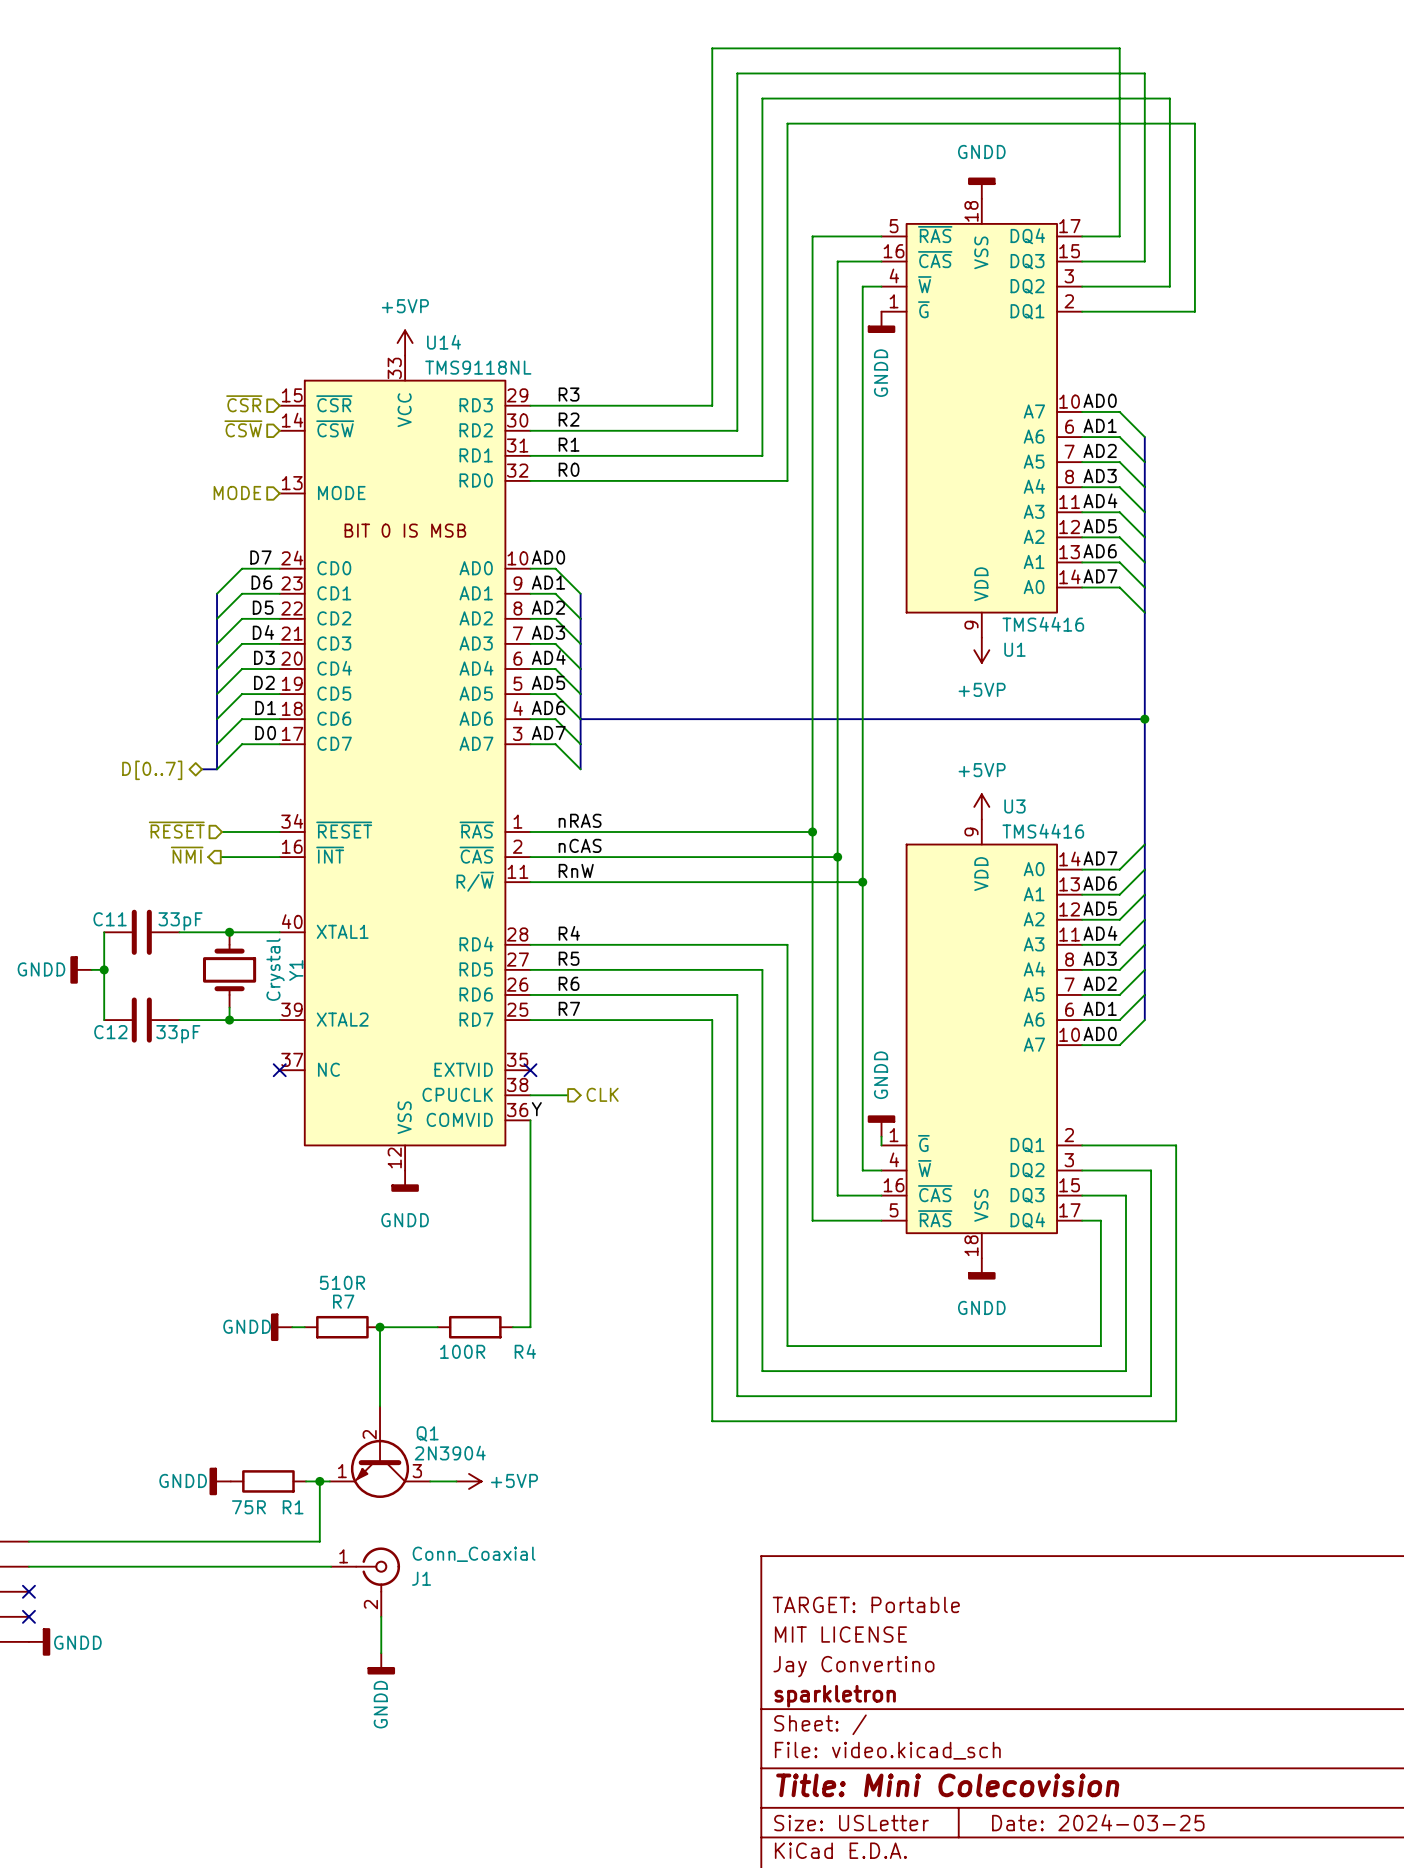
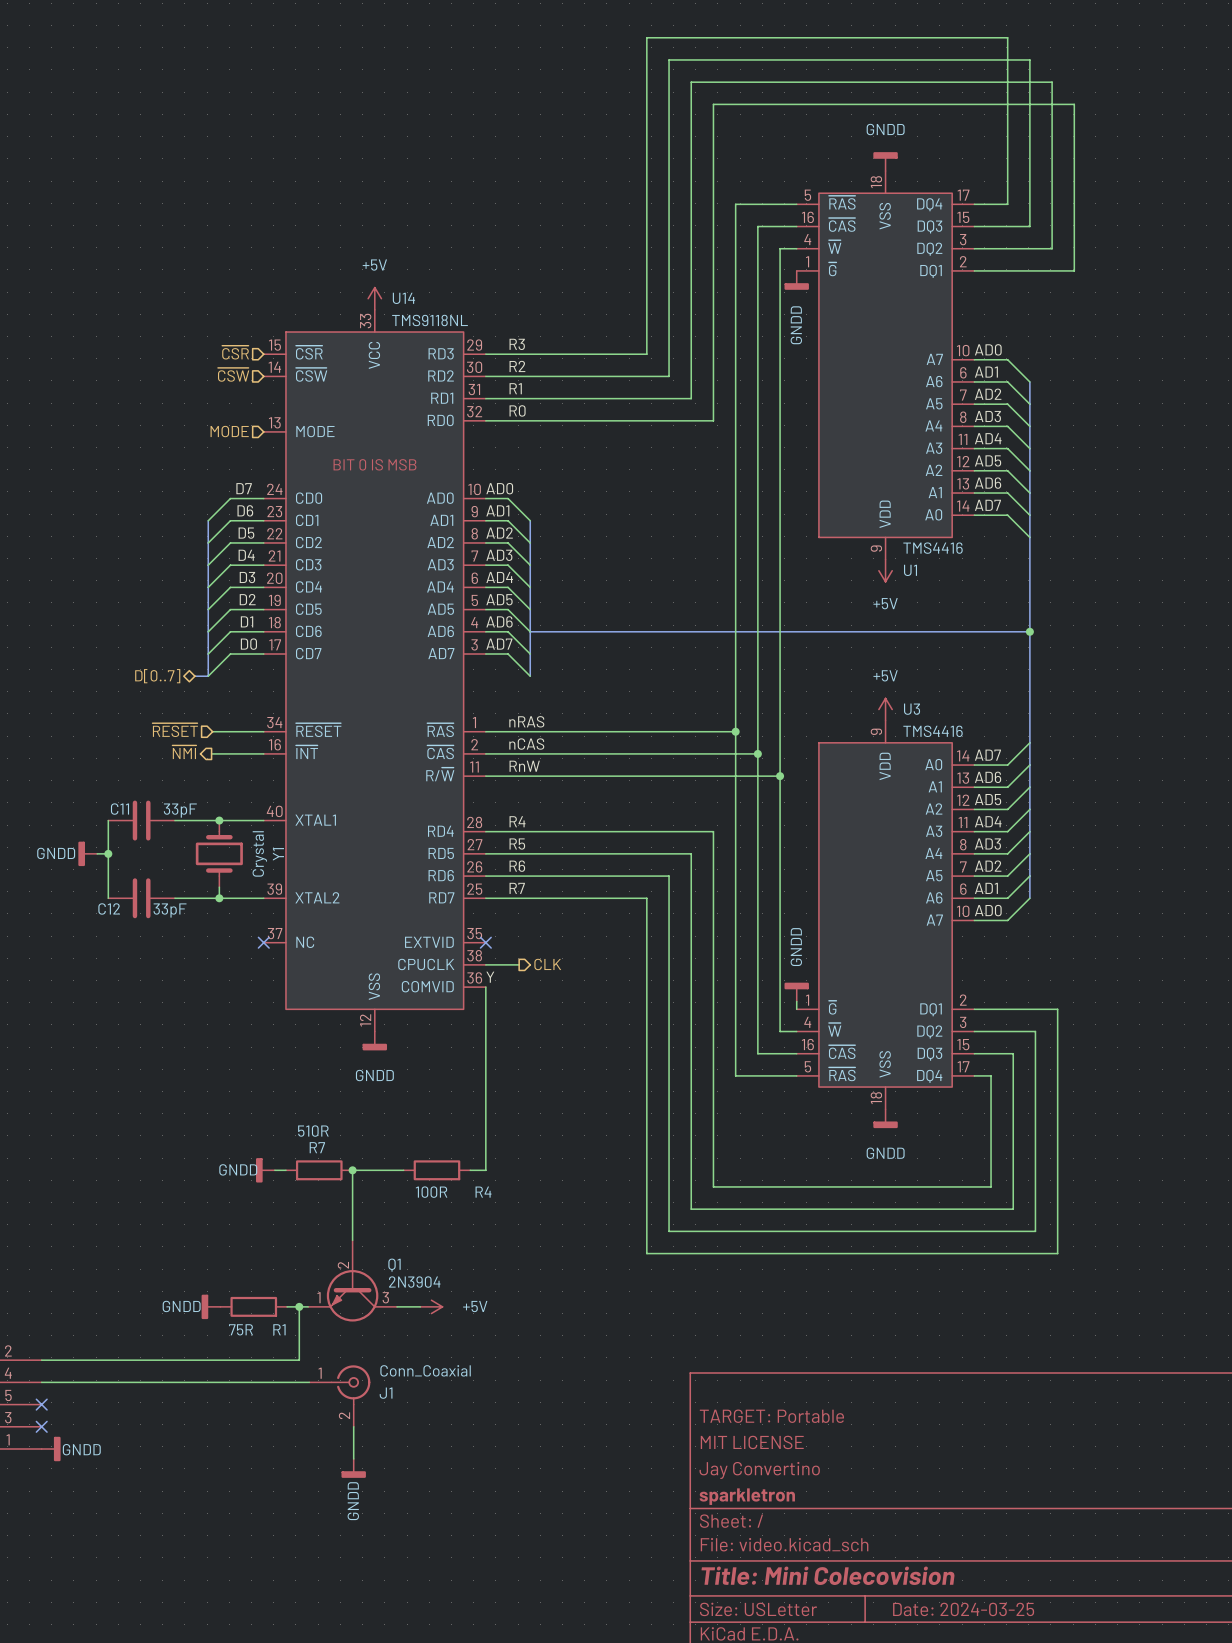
power symbol: +5VP (405, 343) -> +5V (374, 298)
power symbol: +5VP (981, 650) -> +5V (885, 570)
power symbol: +5VP (981, 806) -> +5V (885, 709)
power symbol: +5VP (469, 1481) -> +5V (431, 1306)

